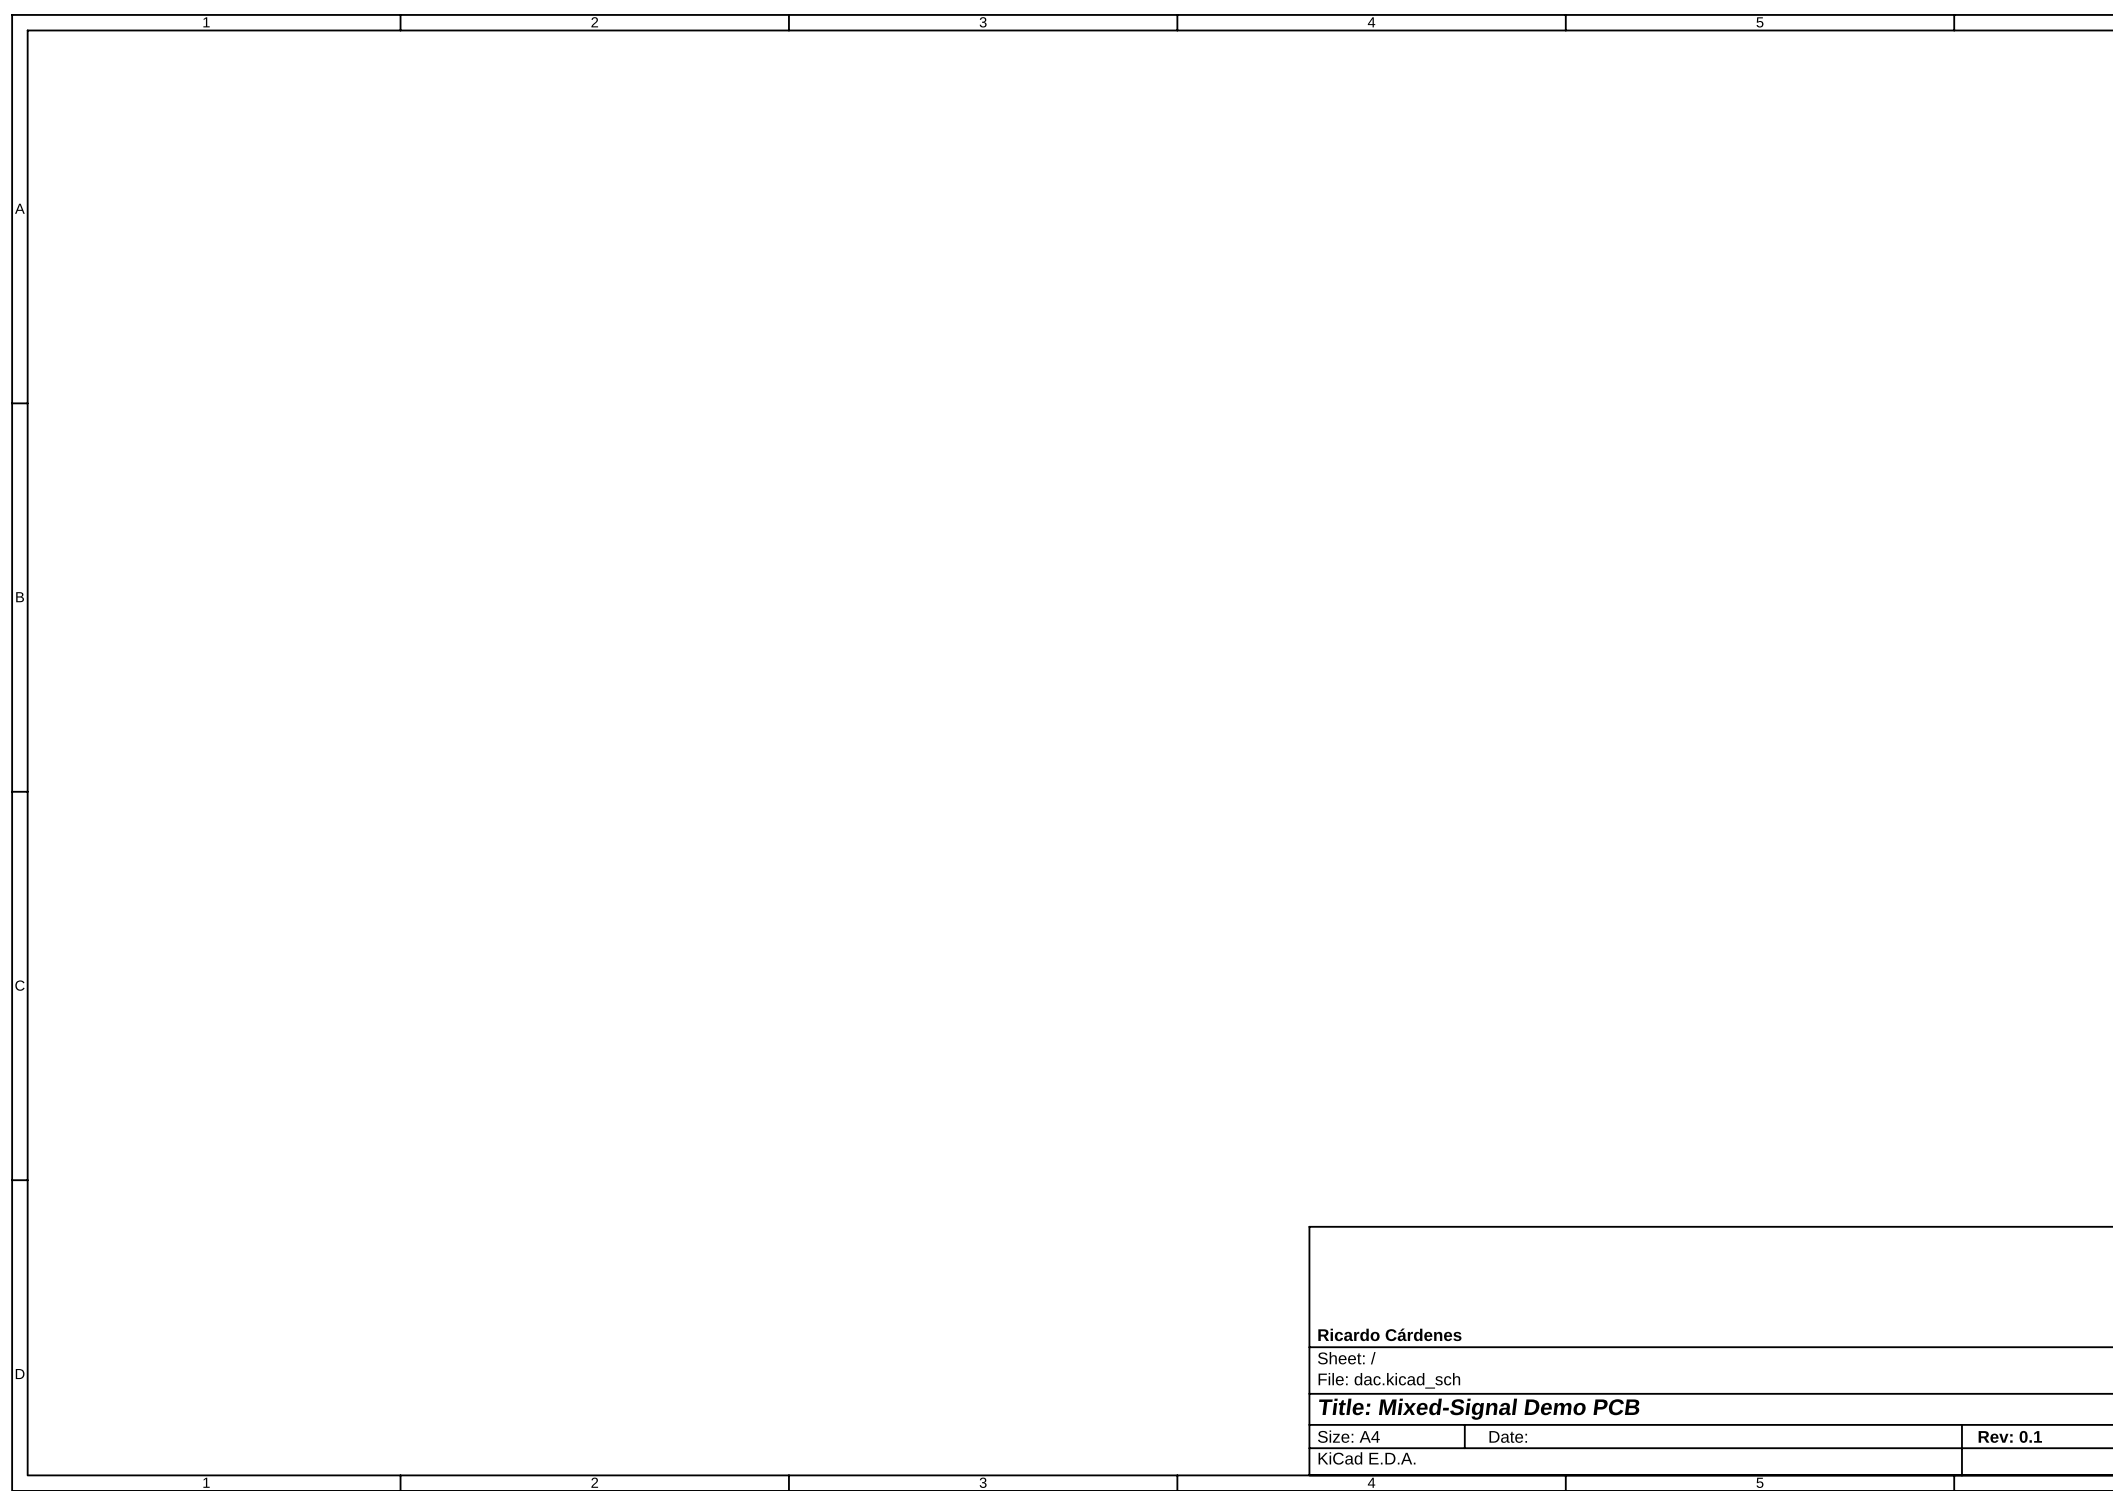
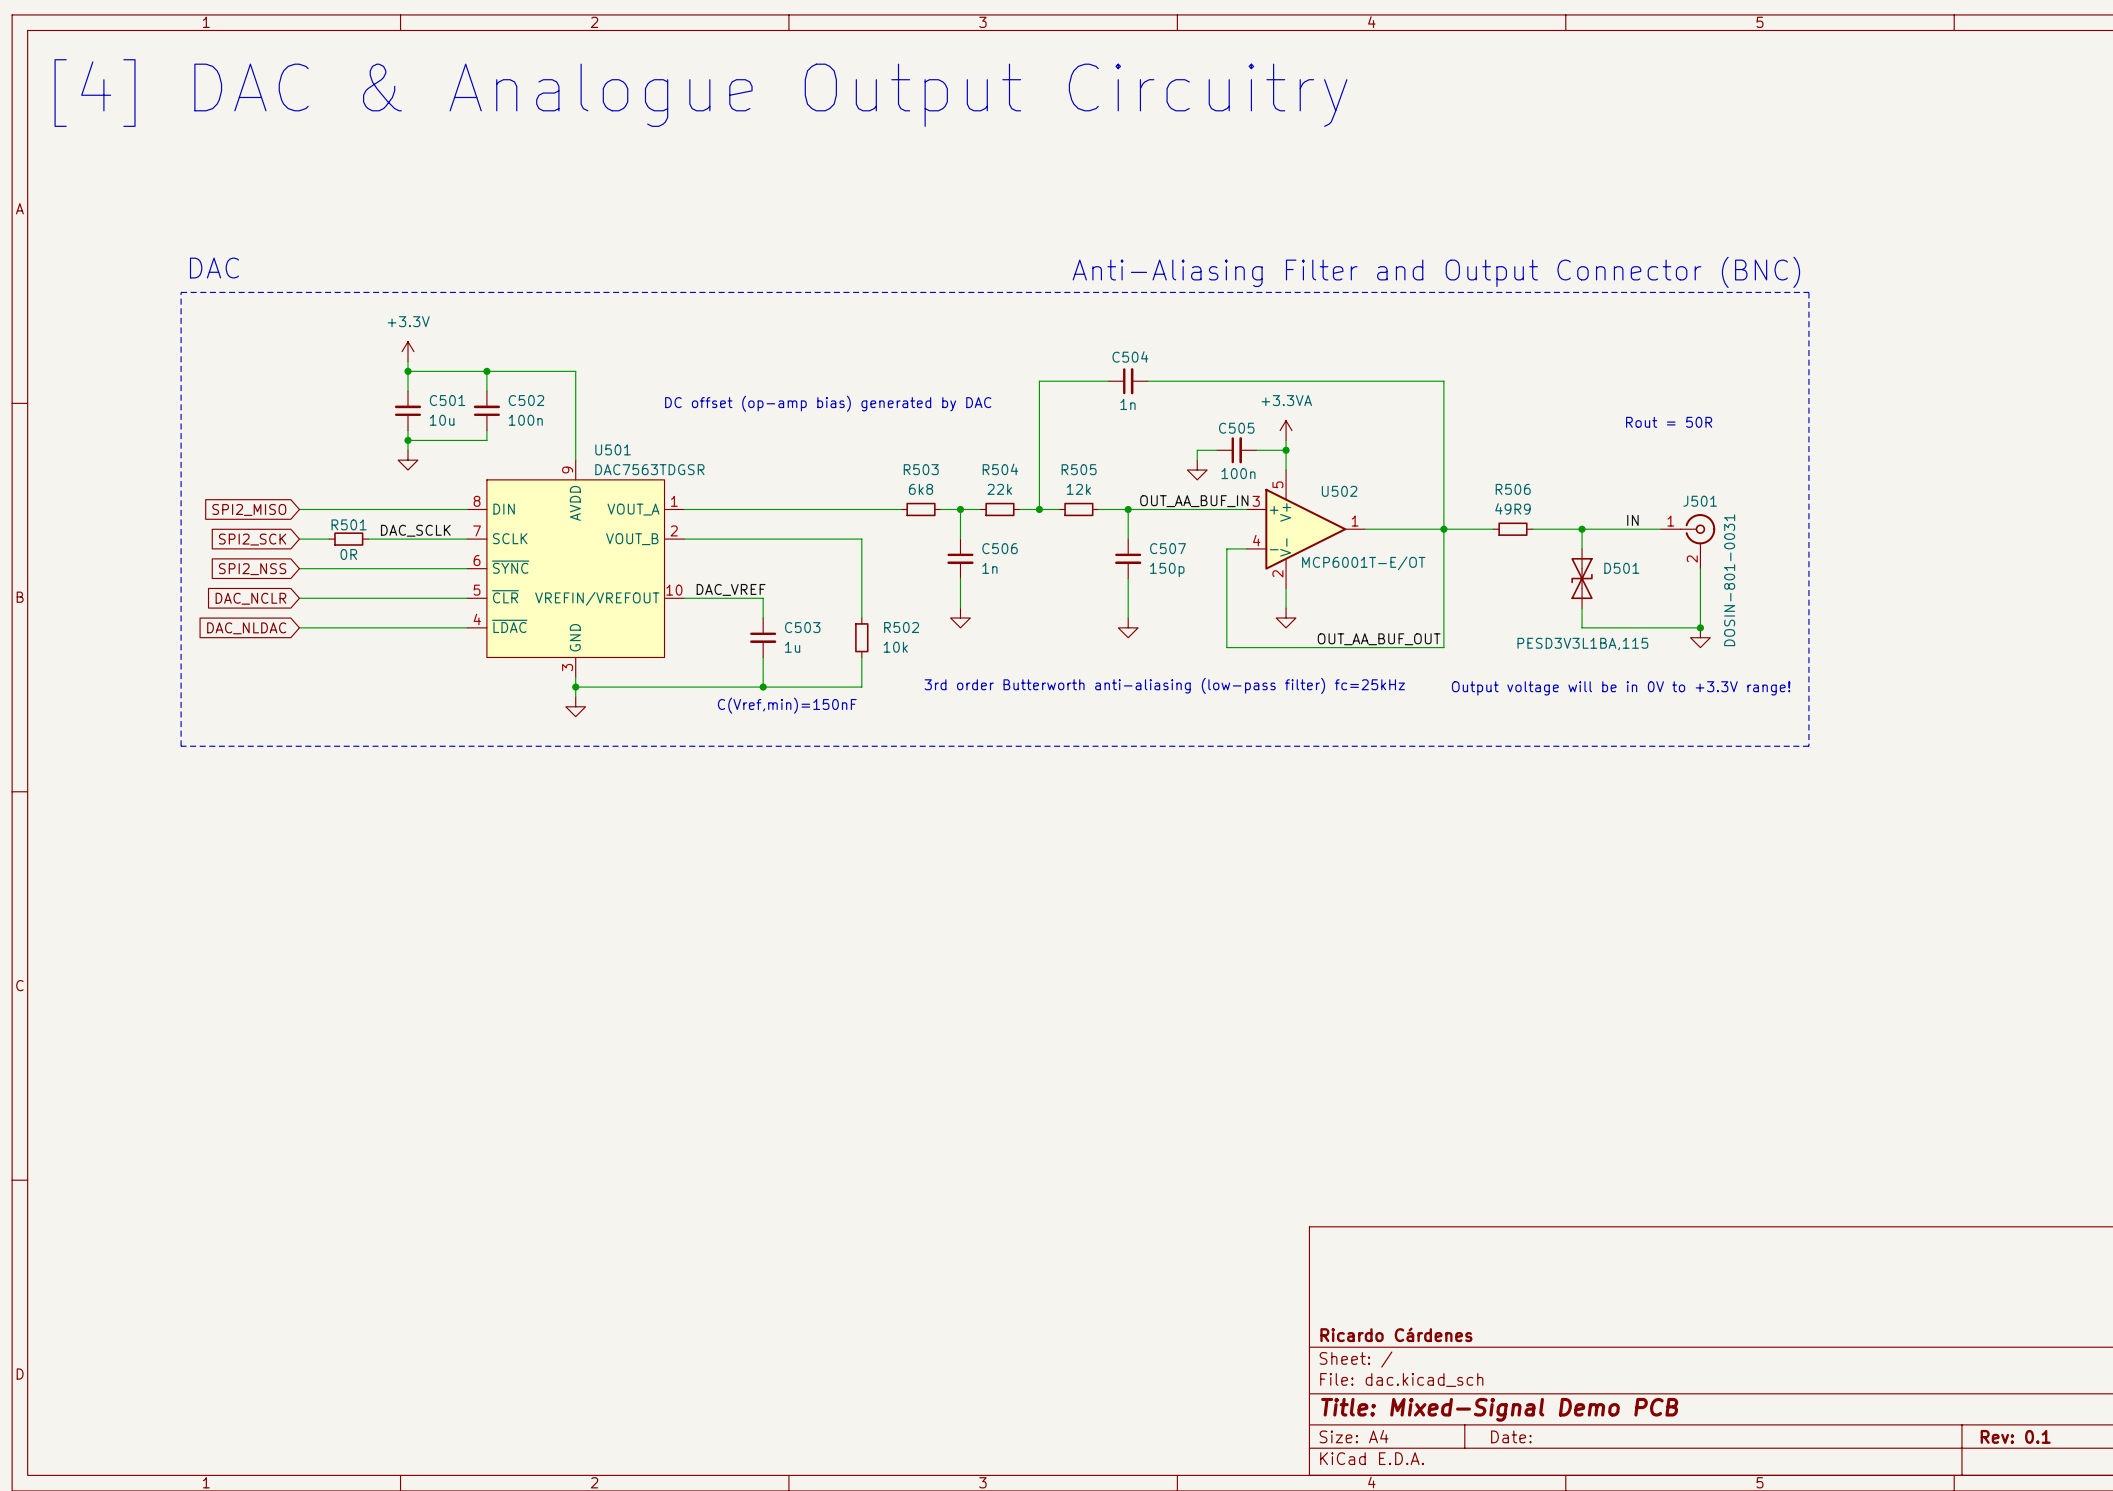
text: none -> [4] DAC & Analogue Output Circuitry (700, 93)
text: none -> DAC (214, 268)
text: none -> Anti-Aliasing Filter and Output Connector (BNC) (1436, 272)
line: none -> (181, 292) (1808, 292) (1808, 746) (181, 746) (181, 292)
power symbol: none -> +3.3V (407, 351)
wire: none -> (407, 361) (407, 391)
wire: none -> (407, 371) (575, 371) (575, 460)
junction: none -> (407, 371)
wire: none -> (486, 371) (486, 391)
junction: none -> (486, 371)
wire: none -> (1108, 381) (1039, 381) (1039, 509)
C504: none -> 1n (1128, 381)
wire: none -> (1147, 381) (1443, 381) (1443, 647) (1226, 647) (1226, 548) (1246, 548)
text: none -> DC offset (op-amp bias) generated by DAC (828, 403)
C501: none -> 10u (407, 410)
C502: none -> 100n (486, 410)
text: none -> Rout = 50R (1669, 422)
wire: none -> (407, 430) (407, 450)
wire: none -> (486, 430) (486, 440) (407, 440)
power symbol: none -> +3.3VA (1286, 430)
junction: none -> (407, 440)
wire: none -> (1286, 440) (1286, 470)
wire: none -> (1216, 450) (1197, 450) (1197, 460)
C505: none -> 100n (1236, 450)
wire: none -> (1256, 450) (1286, 450)
junction: none -> (1286, 450)
power symbol: none -> (407, 460)
power symbol: none -> (1197, 470)
label: none -> OUT_AA_BUF_IN (1194, 501)
wire: none -> (299, 509) (467, 509)
wire: none -> (684, 509) (901, 509)
R503: none -> 6k8 (921, 509)
wire: none -> (940, 509) (980, 509)
wire: none -> (960, 509) (960, 539)
junction: none -> (960, 509)
R504: none -> 22k (999, 509)
wire: none -> (1019, 509) (1059, 509)
junction: none -> (1039, 509)
R505: none -> 12k (1078, 509)
wire: none -> (1098, 509) (1246, 509)
wire: none -> (1128, 509) (1128, 539)
junction: none -> (1128, 509)
global label: none -> SPI2_MISO (249, 509)
label: none -> IN (1632, 520)
U502: none -> MCP6001T-E/OT (1305, 529)
wire: none -> (1364, 529) (1493, 529)
junction: none -> (1443, 529)
R506: none -> 49R9 (1512, 529)
wire: none -> (1532, 529) (1660, 529)
wire: none -> (1582, 529) (1582, 548)
junction: none -> (1582, 529)
label: none -> DAC_SCLK (415, 530)
wire: none -> (299, 539) (329, 539)
R501: none -> 0R (348, 539)
wire: none -> (368, 539) (467, 539)
wire: none -> (684, 539) (861, 539) (861, 618)
global label: none -> SPI2_SCK (252, 539)
J501: none -> DOSIN-801-0031 (1688, 541)
C506: none -> 1n (960, 558)
C507: none -> 150p (1128, 558)
wire: none -> (299, 568) (467, 568)
U501: none -> DAC7563TDGSR (575, 568)
wire: none -> (1700, 568) (1700, 627) (1582, 627) (1582, 608)
global label: none -> SPI2_NSS (252, 569)
wire: none -> (960, 578) (960, 608)
wire: none -> (1128, 578) (1128, 618)
D501: none -> PESD3V3L1BA,115 (1582, 578)
wire: none -> (1286, 588) (1286, 608)
label: none -> DAC_VREF (731, 589)
wire: none -> (299, 598) (467, 598)
wire: none -> (684, 598) (763, 598) (763, 618)
global label: none -> DAC_NCLR (250, 598)
power symbol: none -> (960, 618)
power symbol: none -> (1286, 618)
wire: none -> (299, 627) (467, 627)
power symbol: none -> (1128, 627)
junction: none -> (1700, 627)
global label: none -> DAC_NLDAC (246, 628)
C503: none -> 1u (763, 637)
R502: none -> 10k (861, 637)
power symbol: none -> (1700, 637)
label: none -> OUT_AA_BUF_OUT (1379, 639)
wire: none -> (763, 657) (763, 687)
wire: none -> (861, 657) (861, 687) (575, 687)
wire: none -> (575, 677) (575, 696)
text: none -> 3rd order Butterworth anti-aliasing (low-pass filter) fc=25kHz (1164, 685)
junction: none -> (575, 687)
junction: none -> (763, 687)
text: none -> Output voltage will be in 0V to +3.3V range! (1621, 688)
text: none -> C(Vref,min)=150nF (787, 705)
power symbol: none -> (575, 706)

